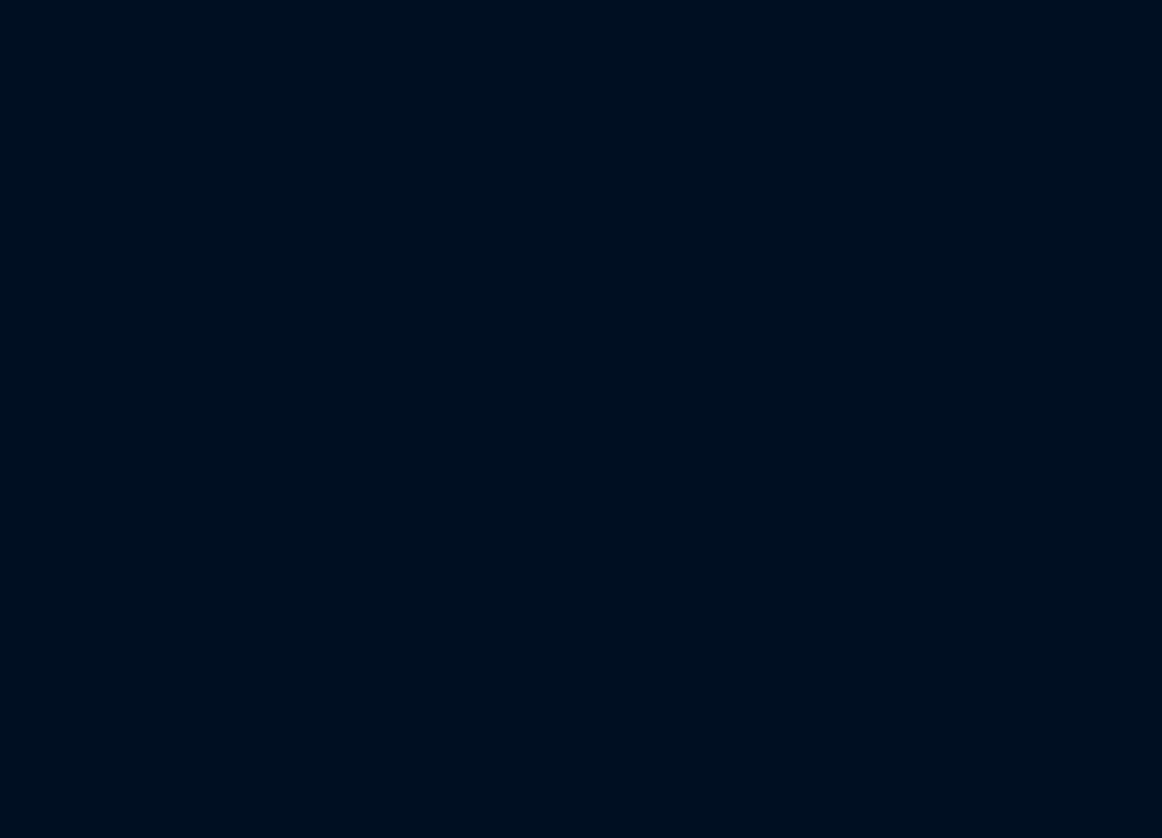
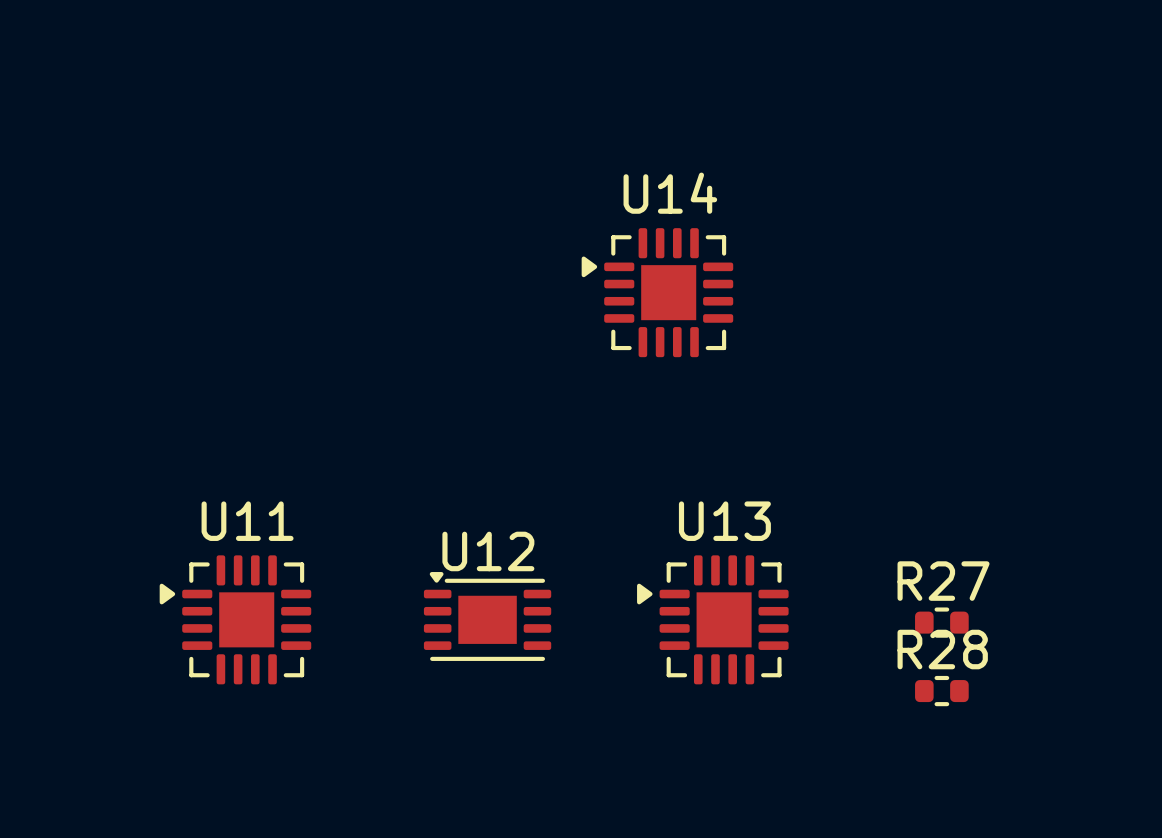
U14: none -> (657, 292)
U12: none -> (487, 616)
U11: none -> (235, 619)
U13: none -> (712, 619)
R27: none -> (941, 622)
R28: none -> (941, 691)

